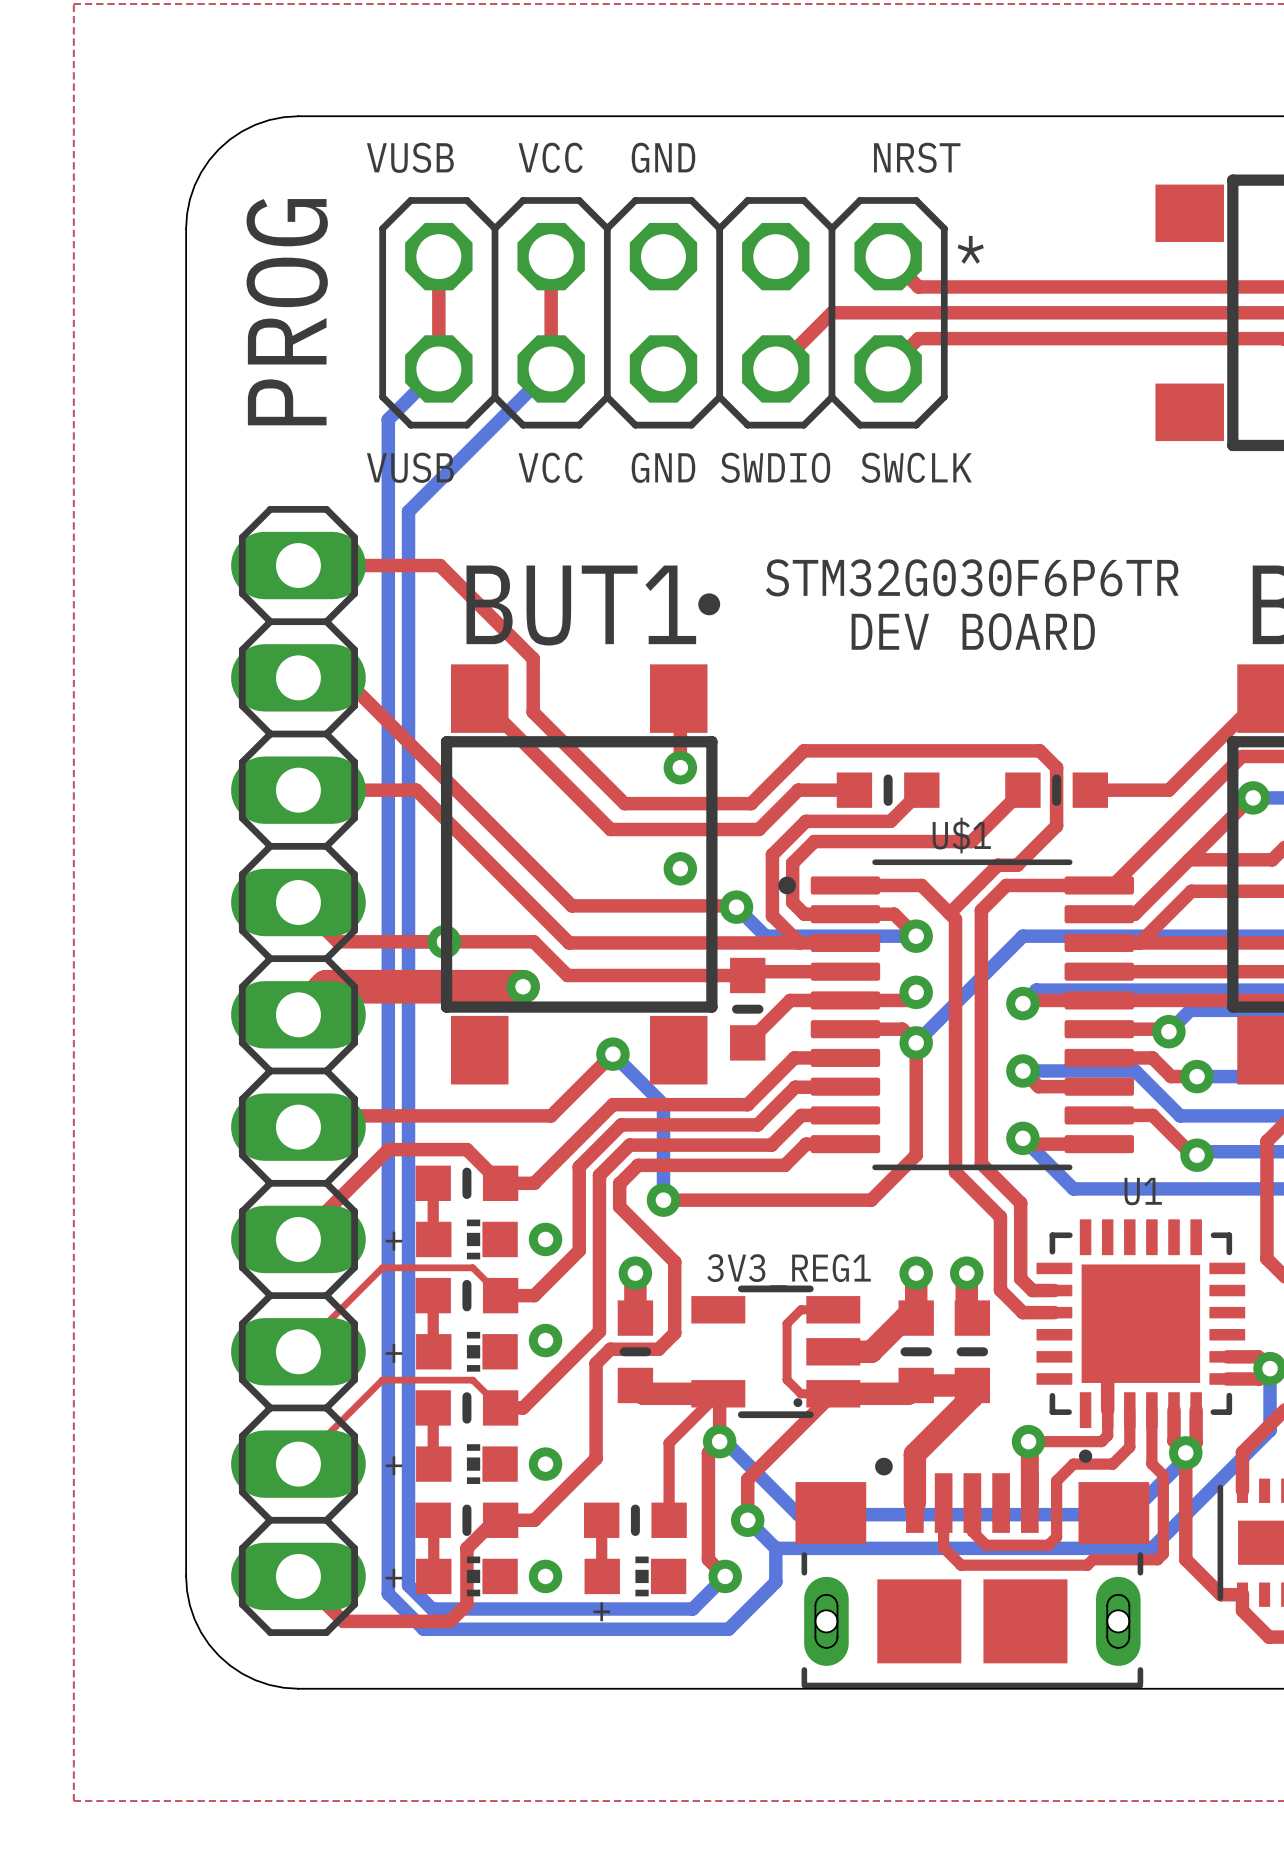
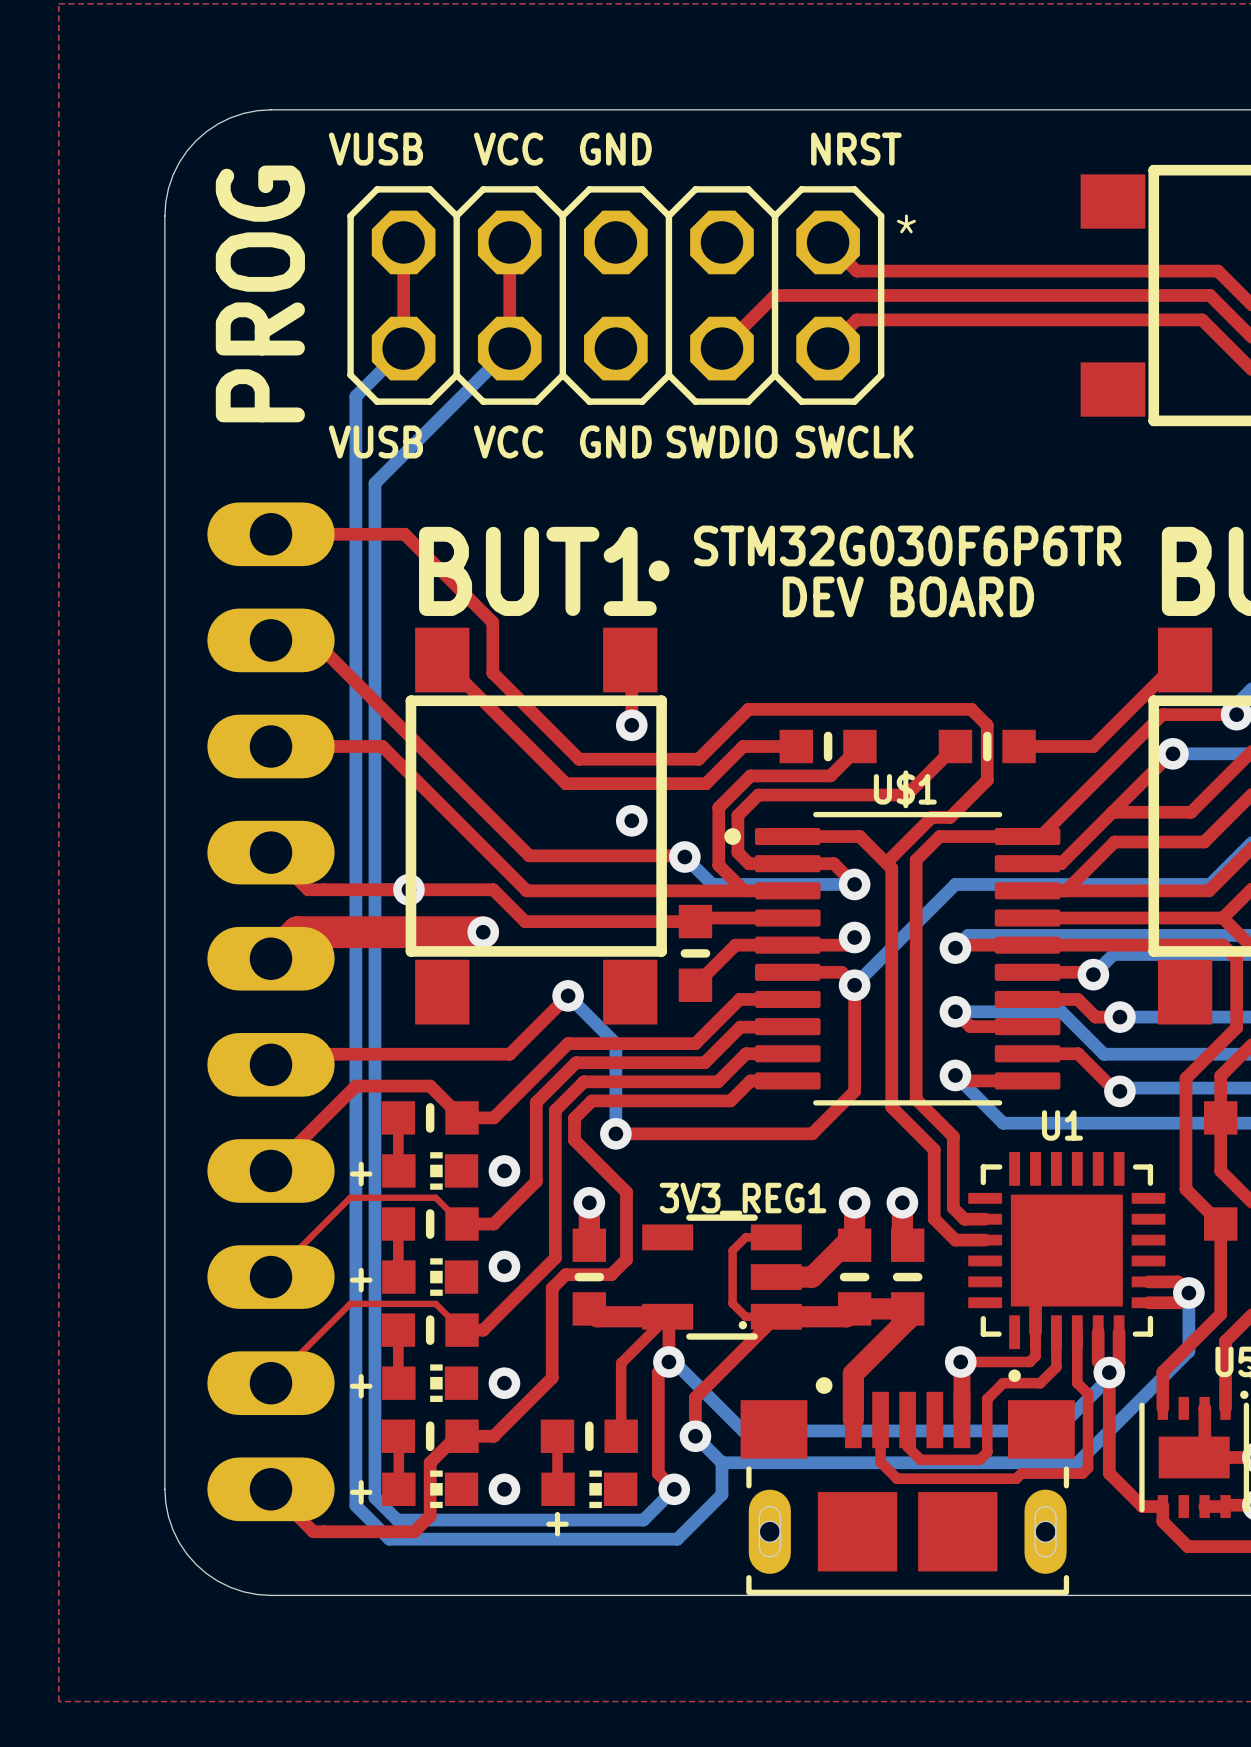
part side: top (298, 1070) -> bottom (271, 1011)

